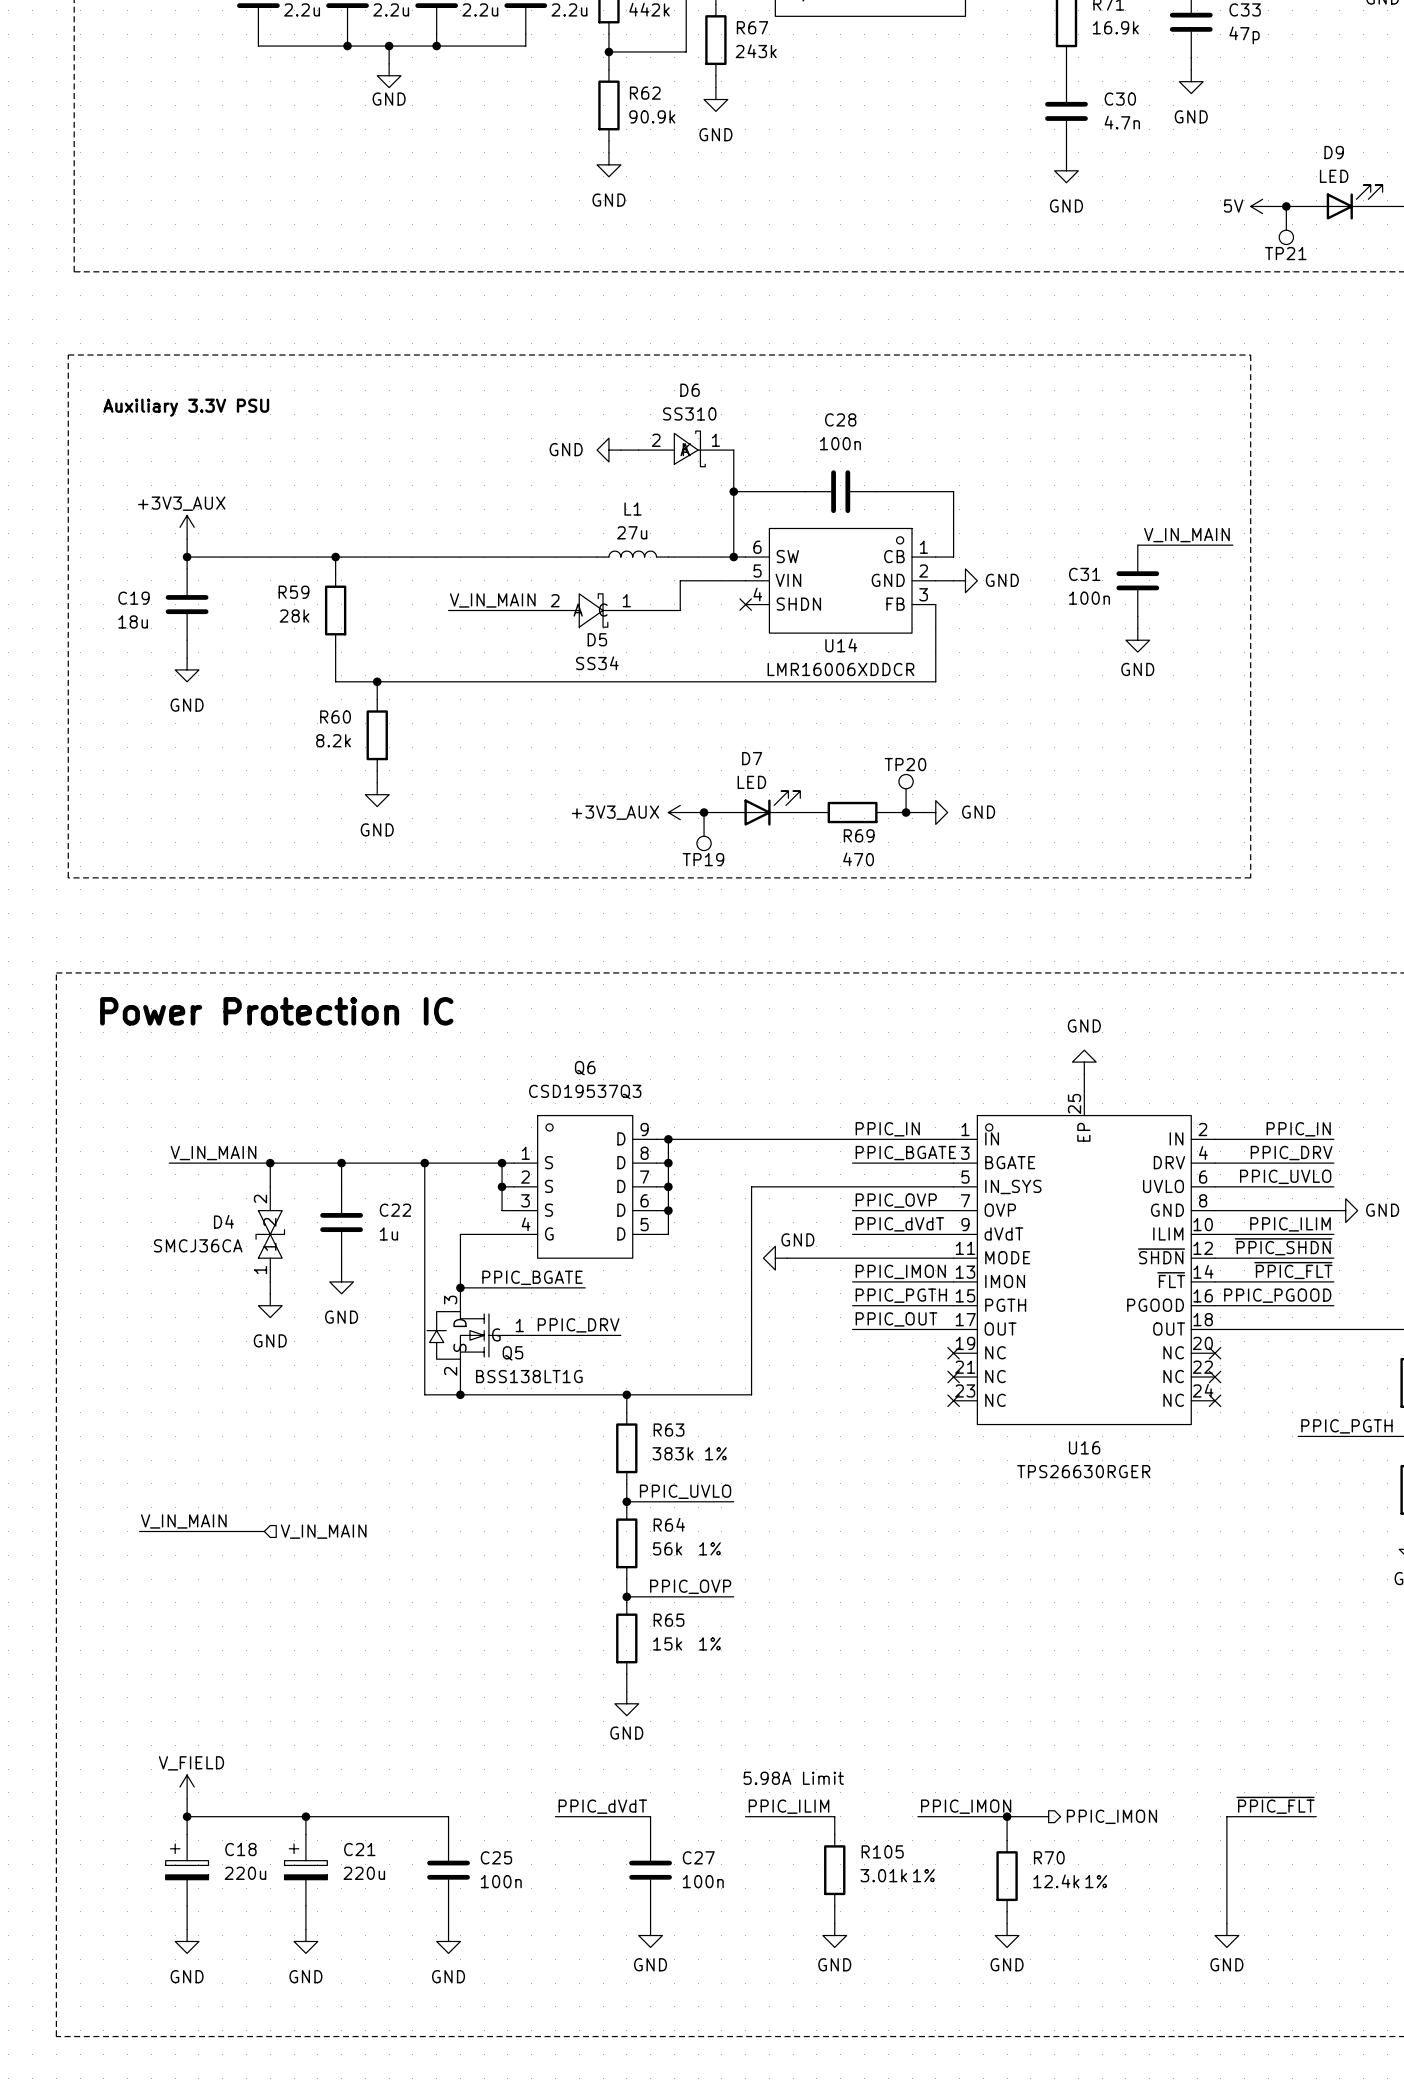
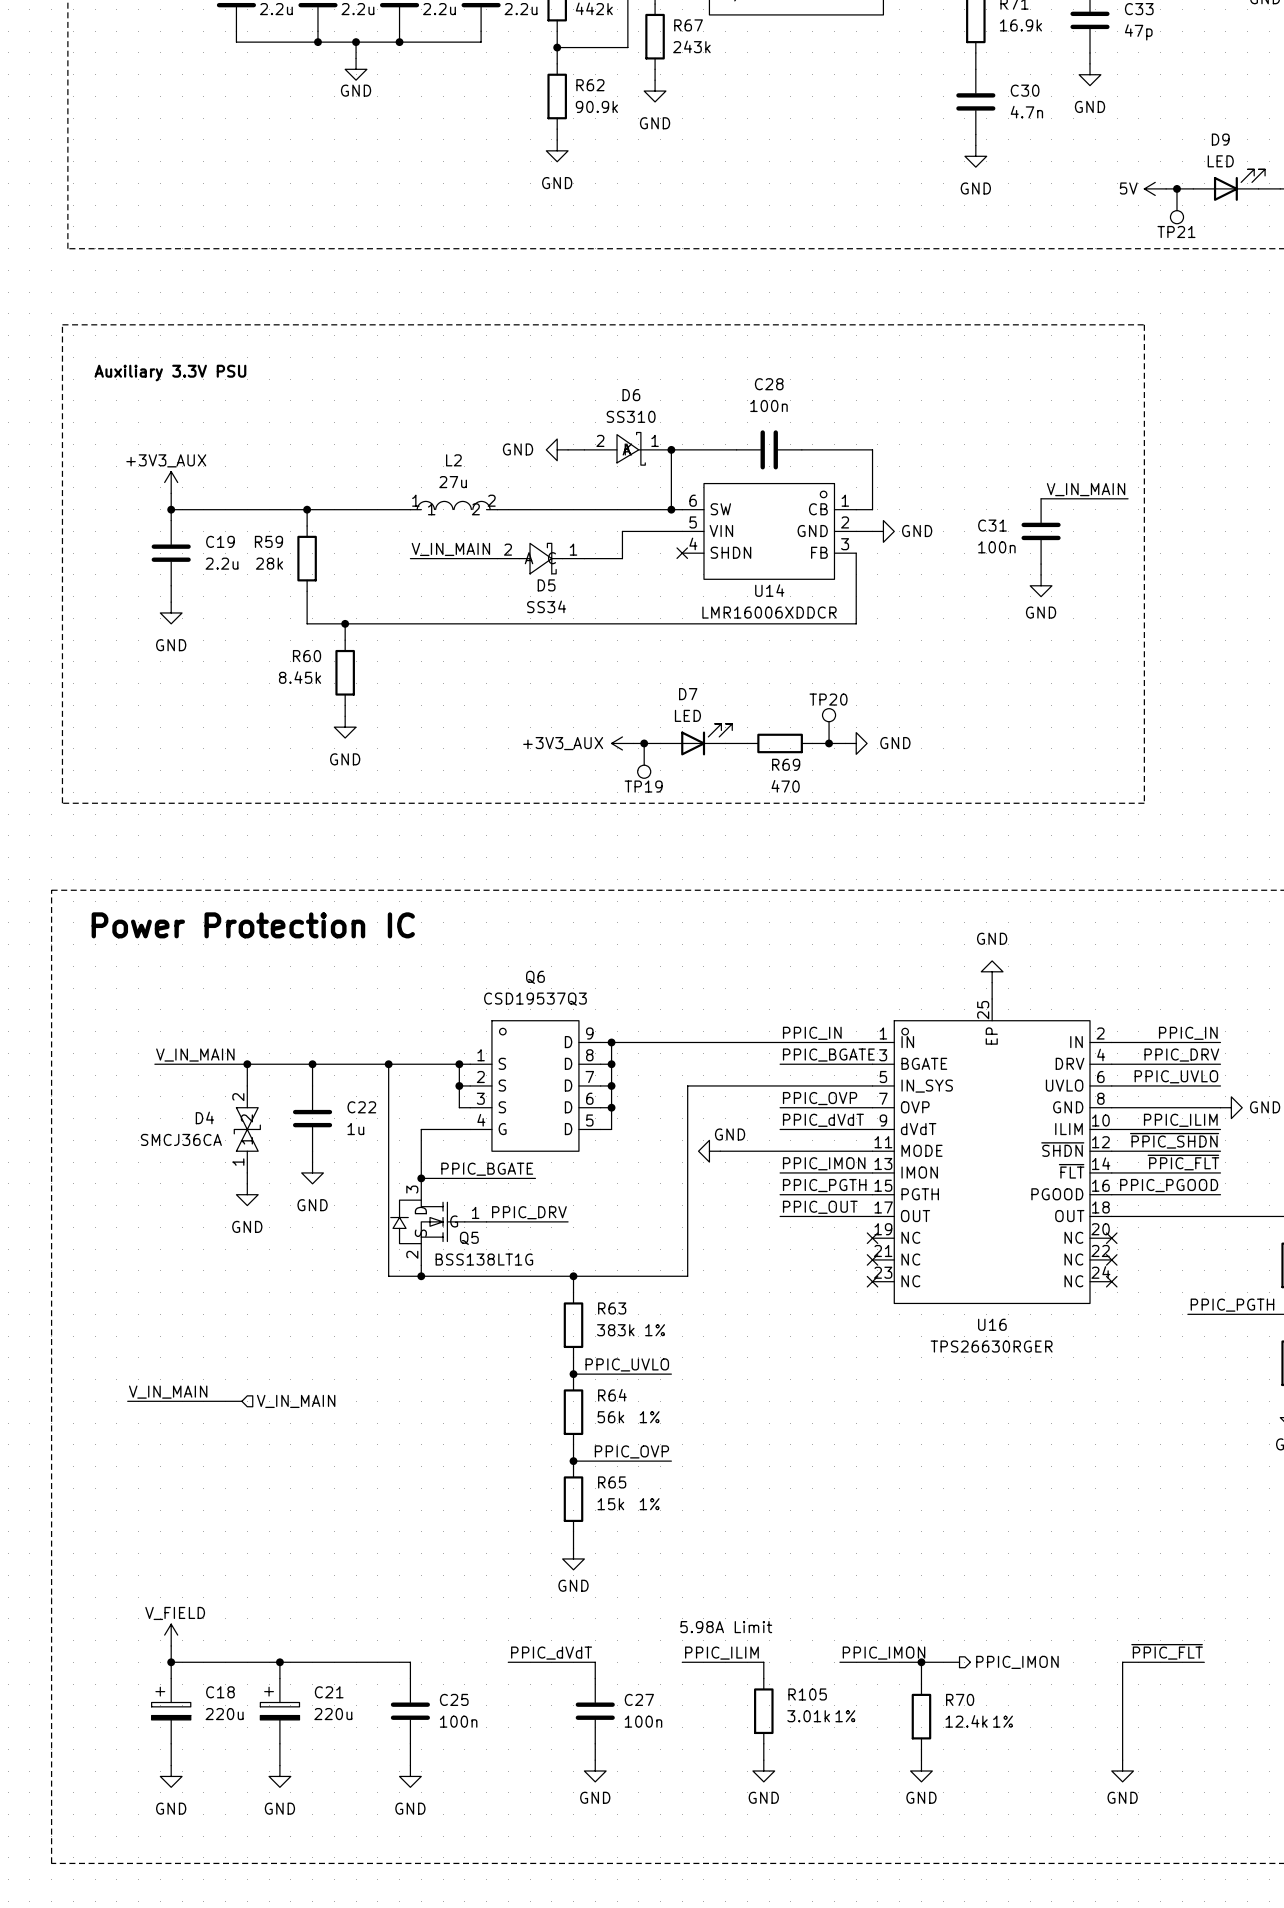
D6 position: (686, 448) -> (627, 448)
power symbol position: GND (608, 450) -> GND (557, 449)
wire: (620, 450) (638, 450) -> (568, 449) (584, 449)
wire: (733, 450) (733, 491) -> none
L2: none -> 27u (453, 505)
L1: 27u (632, 554) -> none
wire: (448, 557) (543, 557) -> none
wire: none -> (546, 509) (611, 509)
C19 name position: C19 (133, 598) -> C19 (220, 541)
C19 value: 18u (133, 621) -> 2.2u (222, 563)
R60 value: 8.2k (333, 740) -> 8.45k (300, 677)

